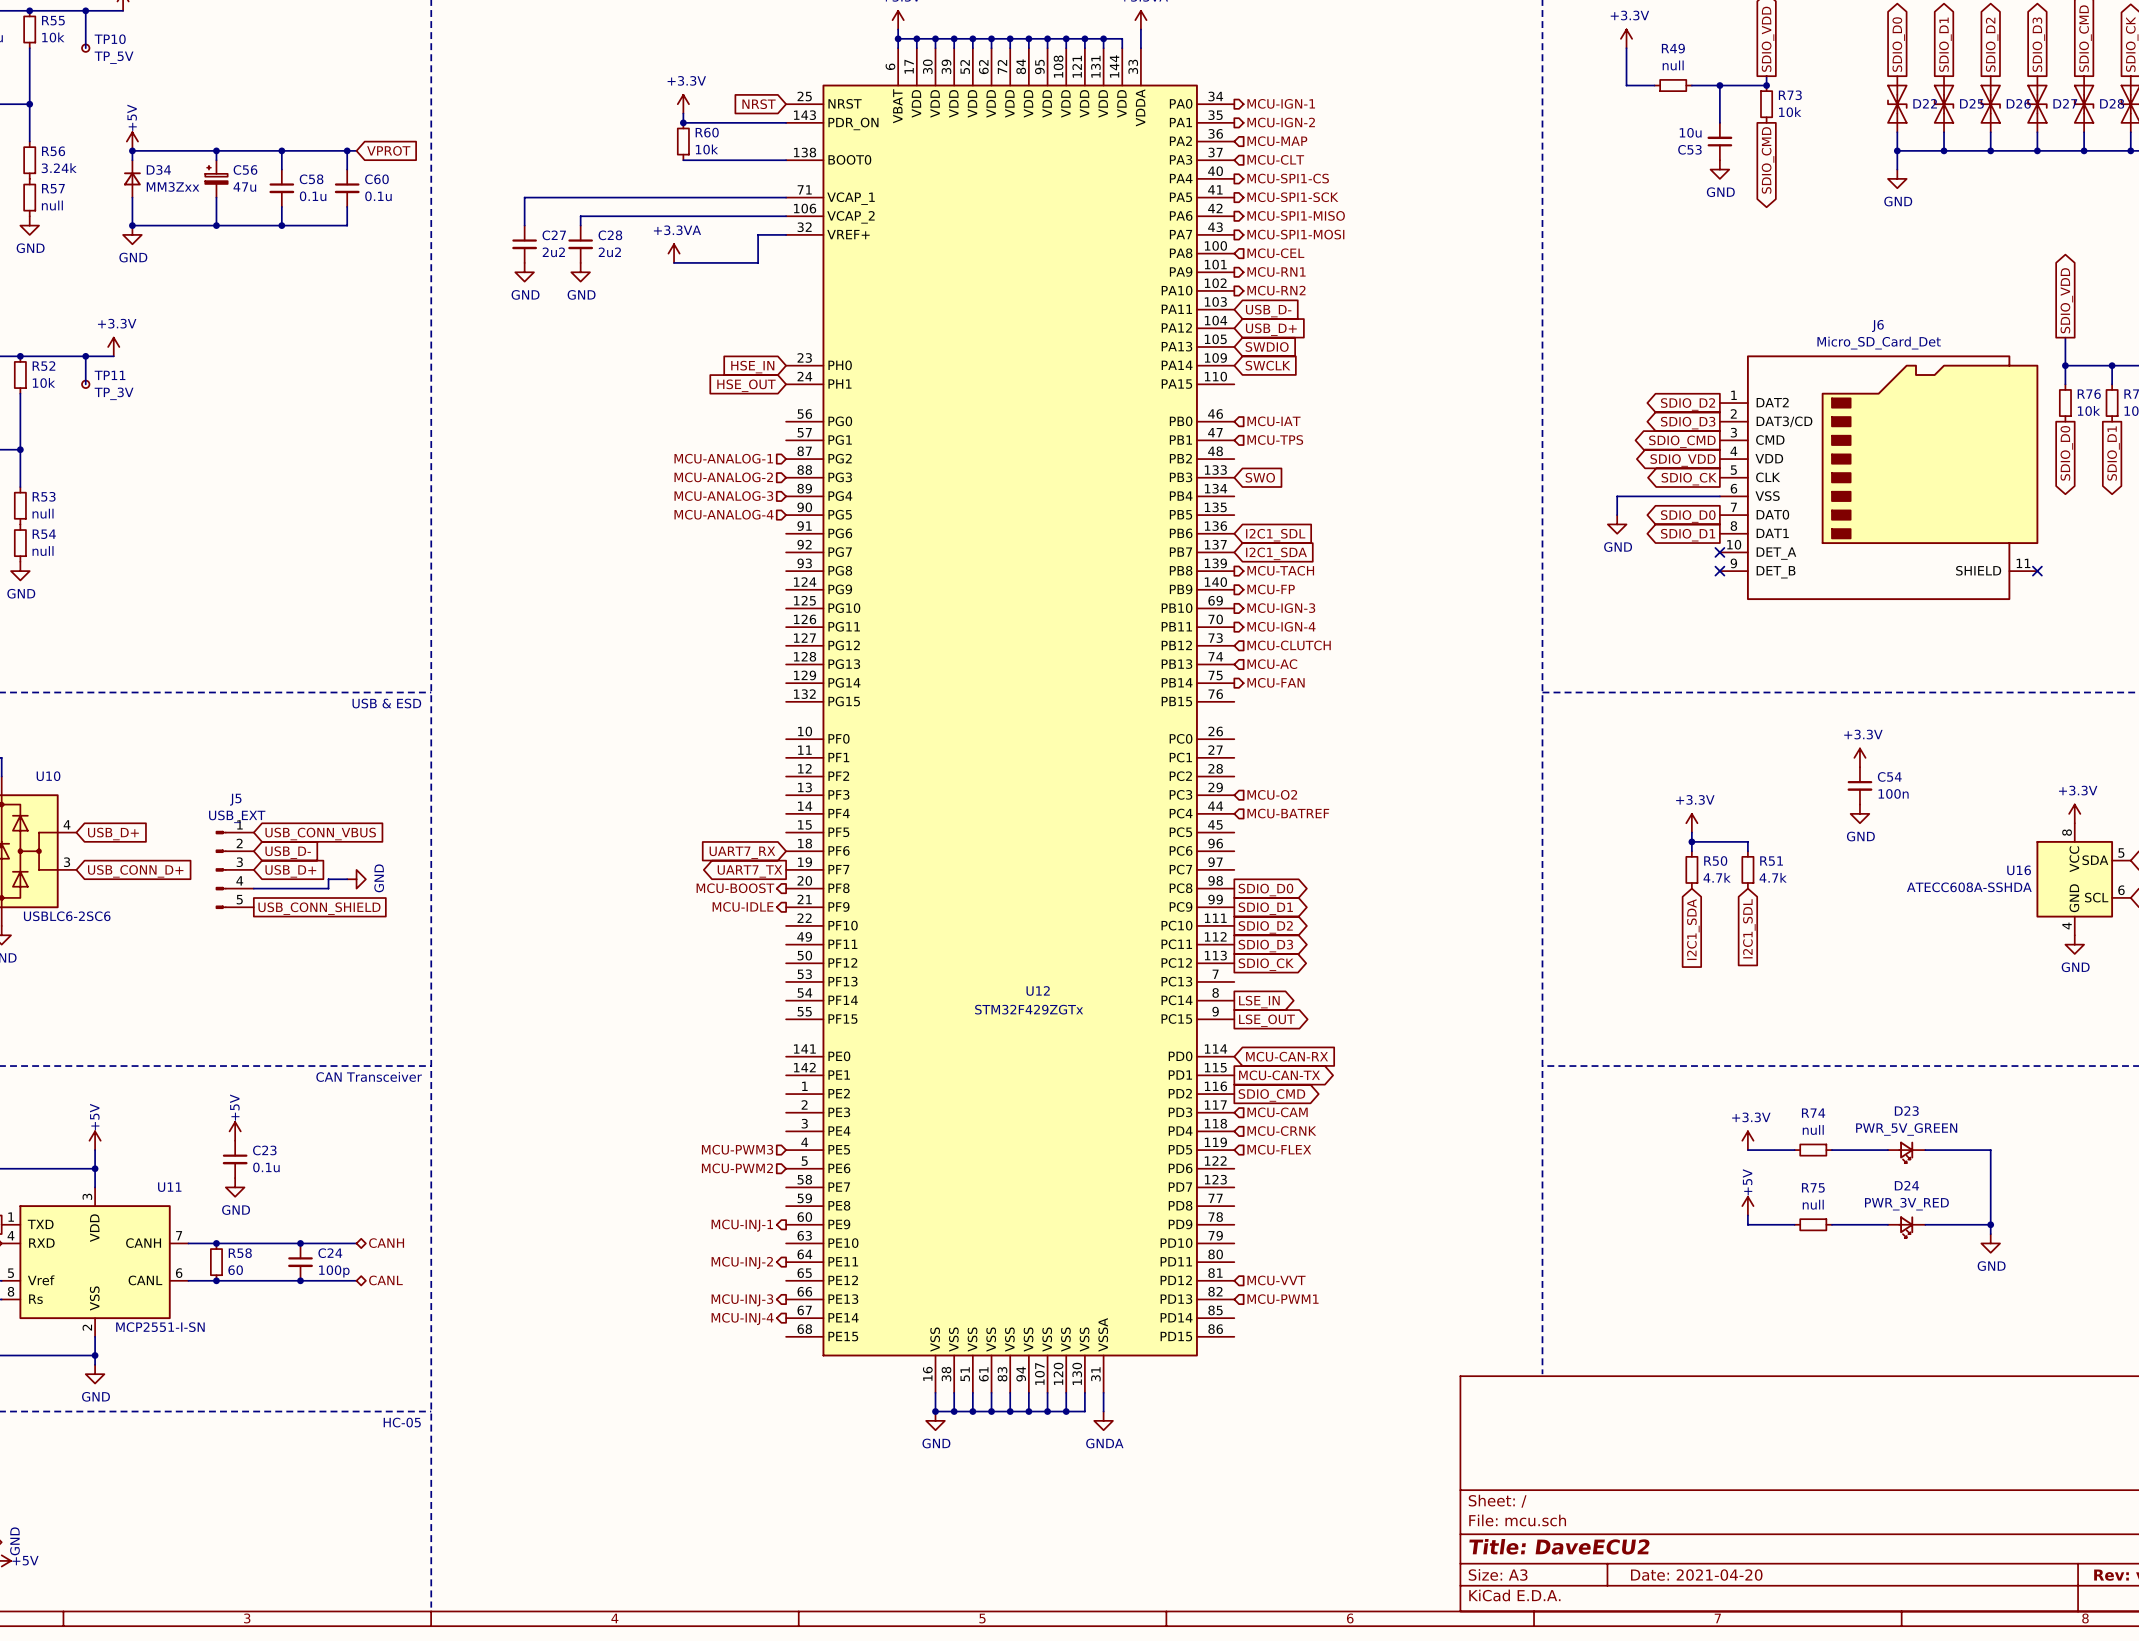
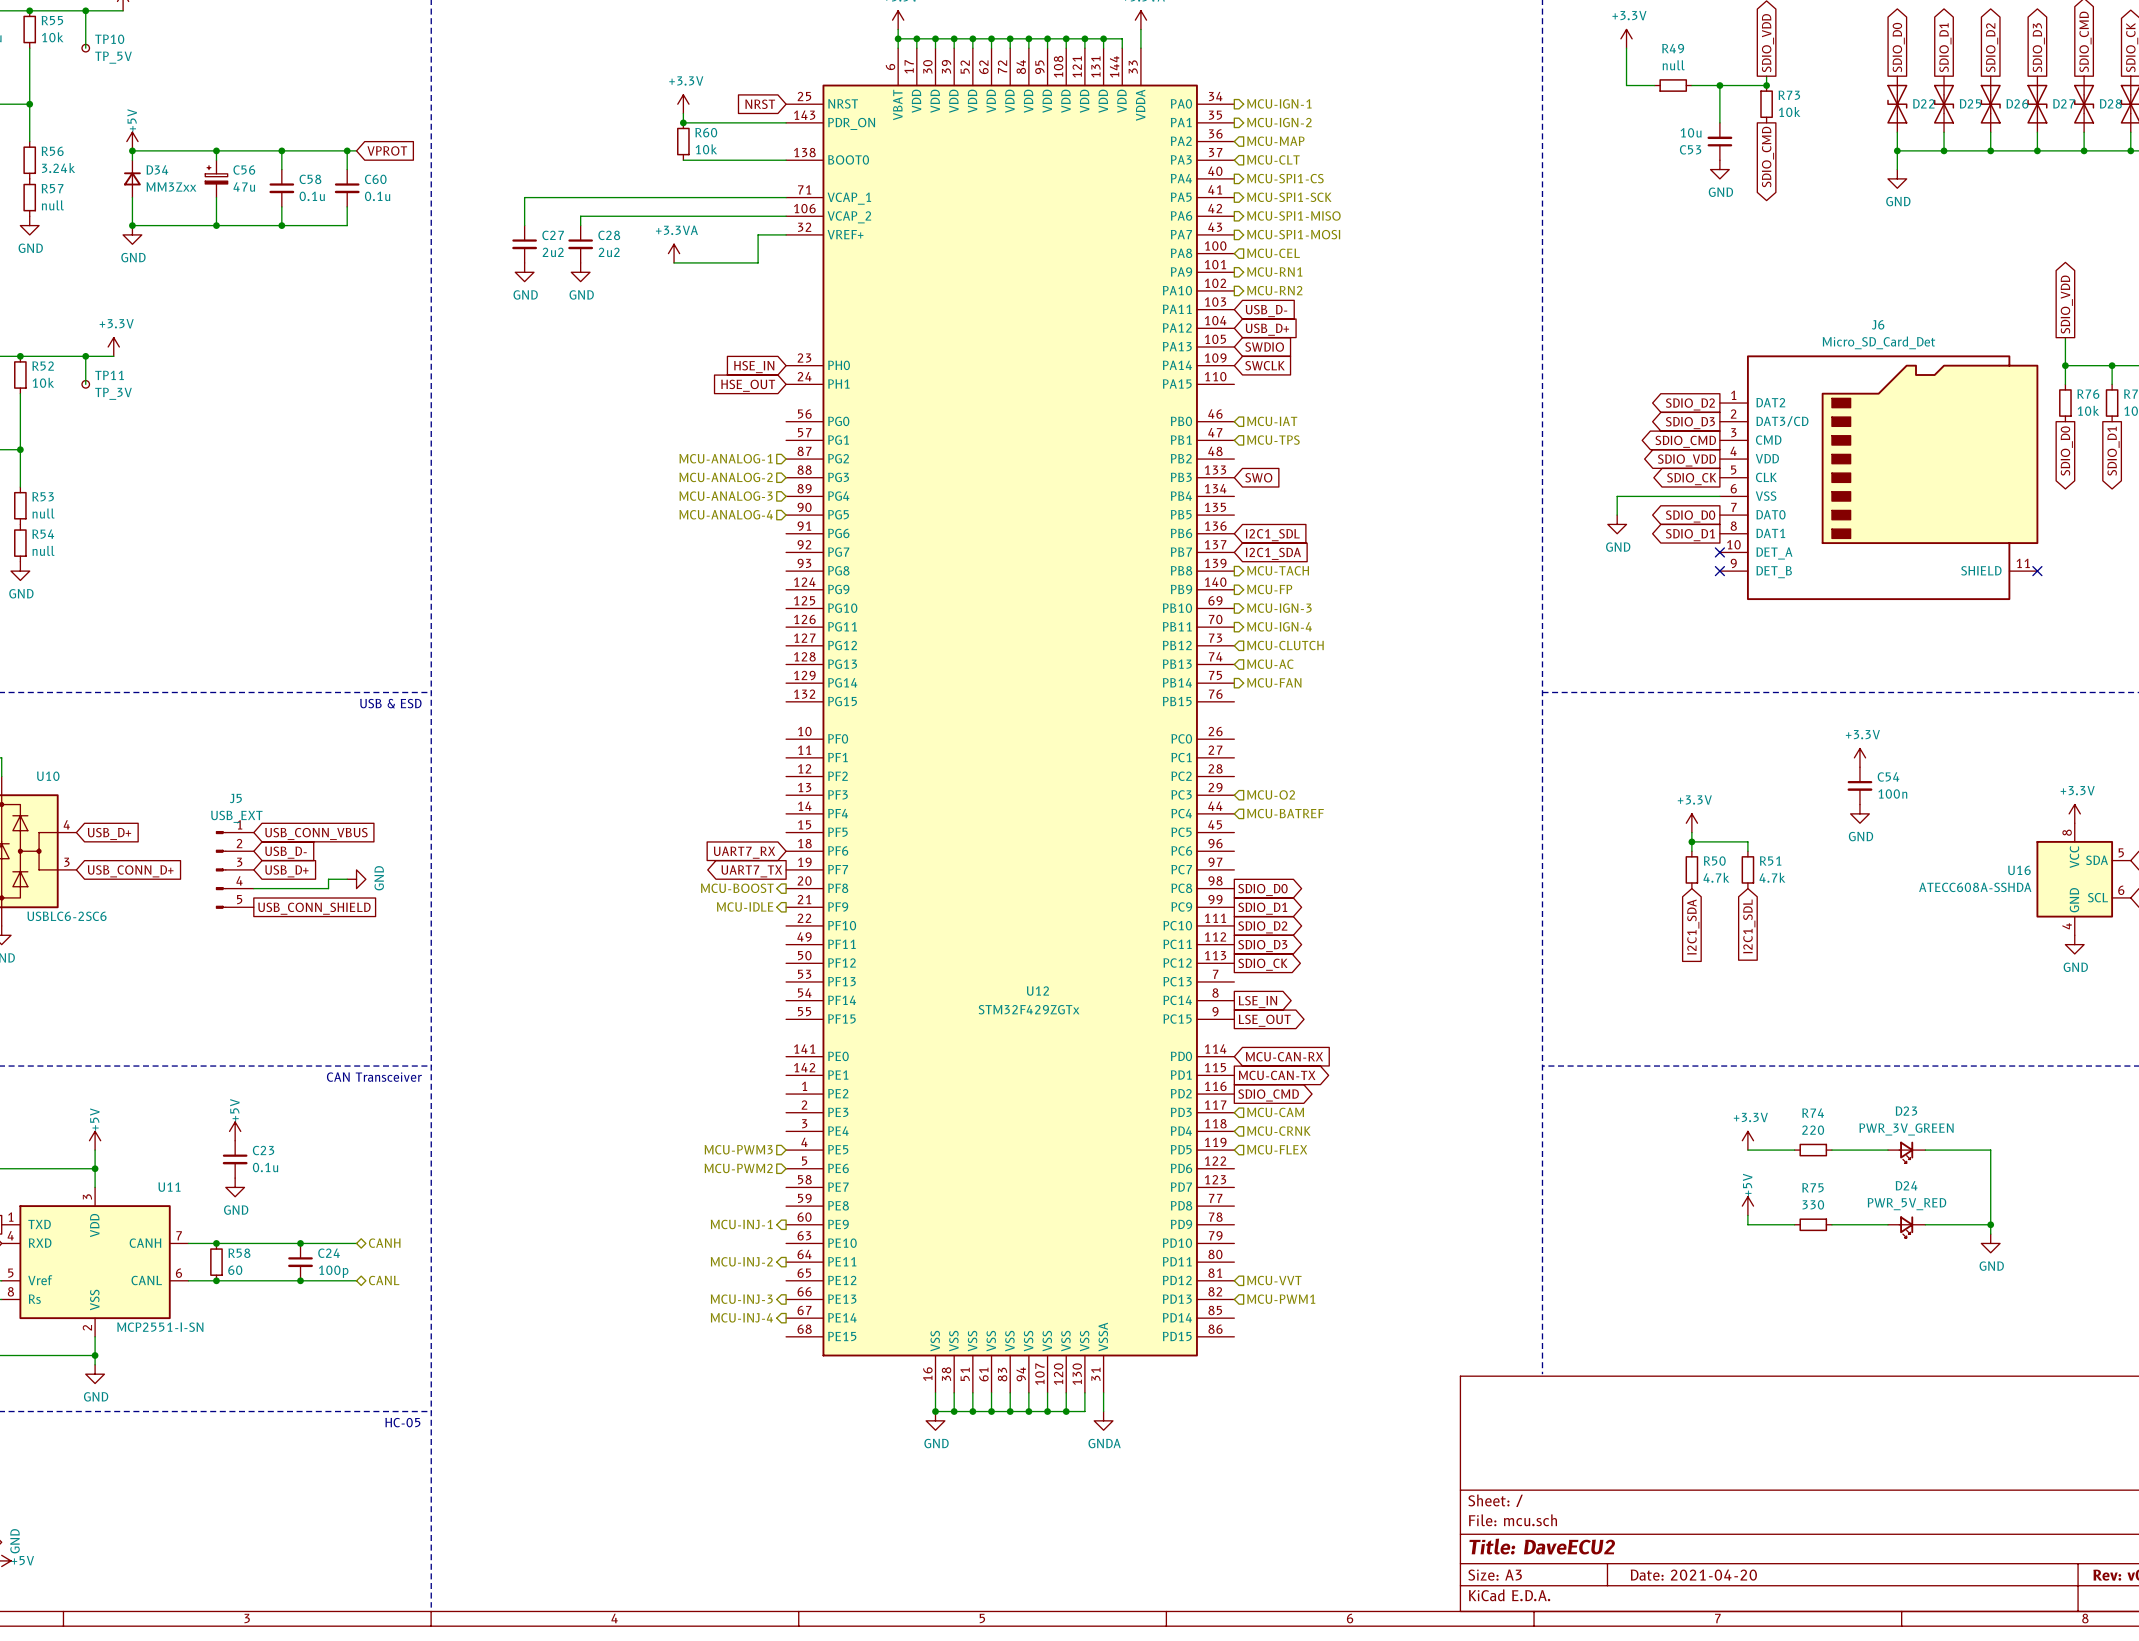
D23 value: PWR_5V_GREEN (1906, 1129) -> PWR_3V_GREEN (1906, 1129)
R74 value: null (1813, 1130) -> 220 (1813, 1130)
R75 value: null (1813, 1204) -> 330 (1813, 1204)
D24 value: PWR_3V_RED (1906, 1204) -> PWR_5V_RED (1906, 1204)

